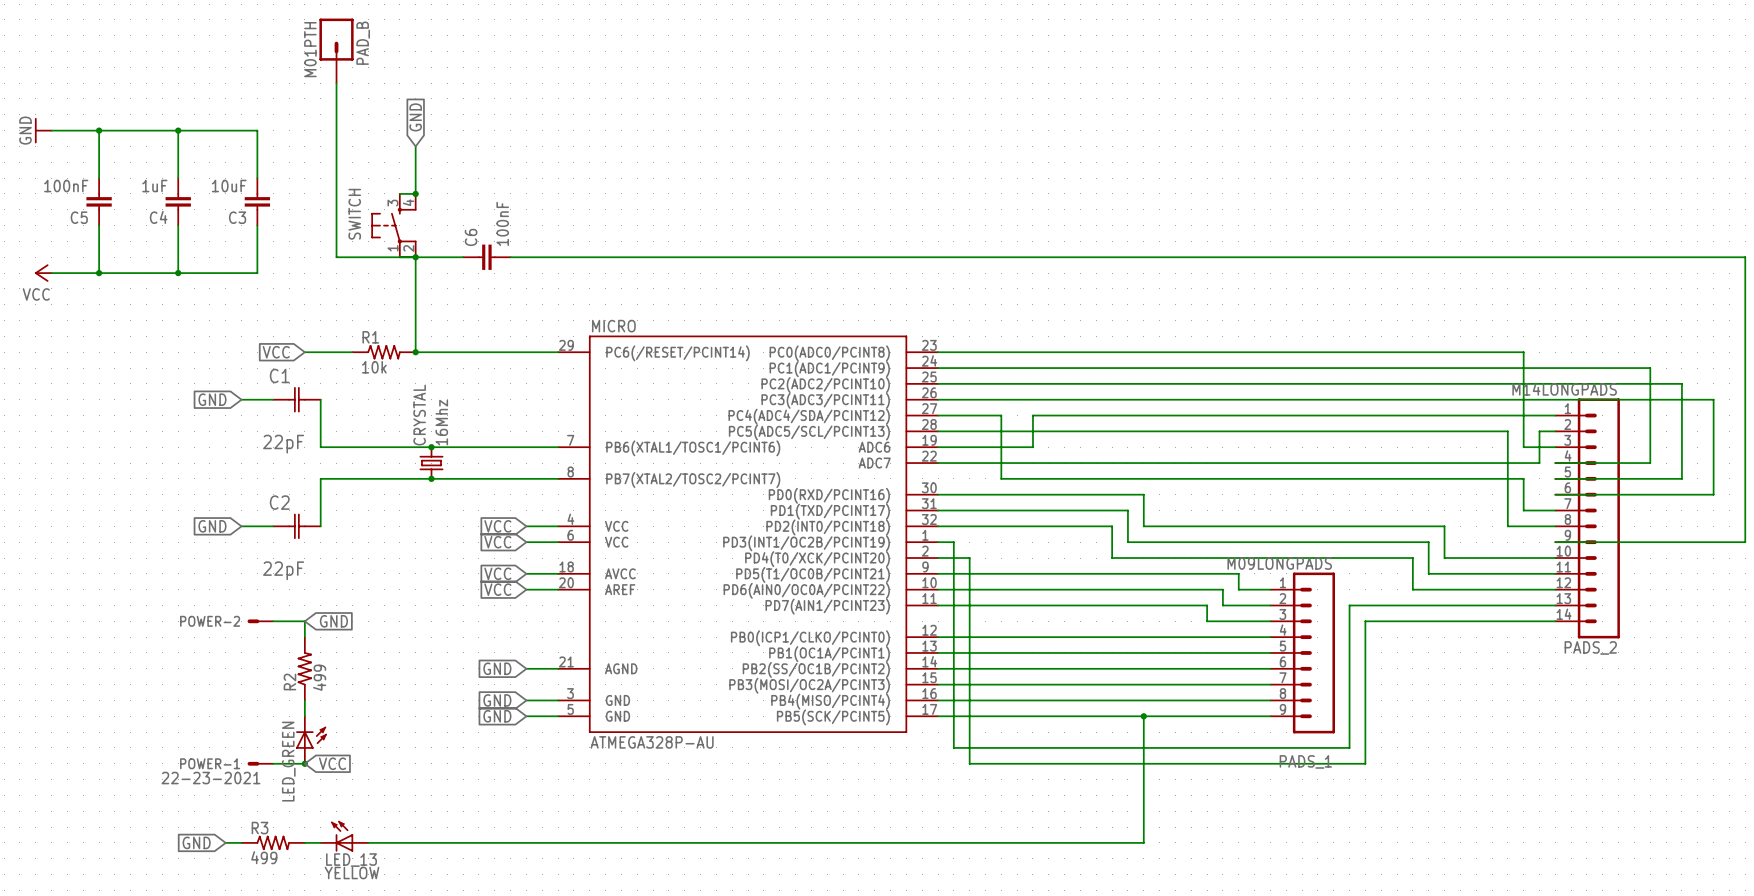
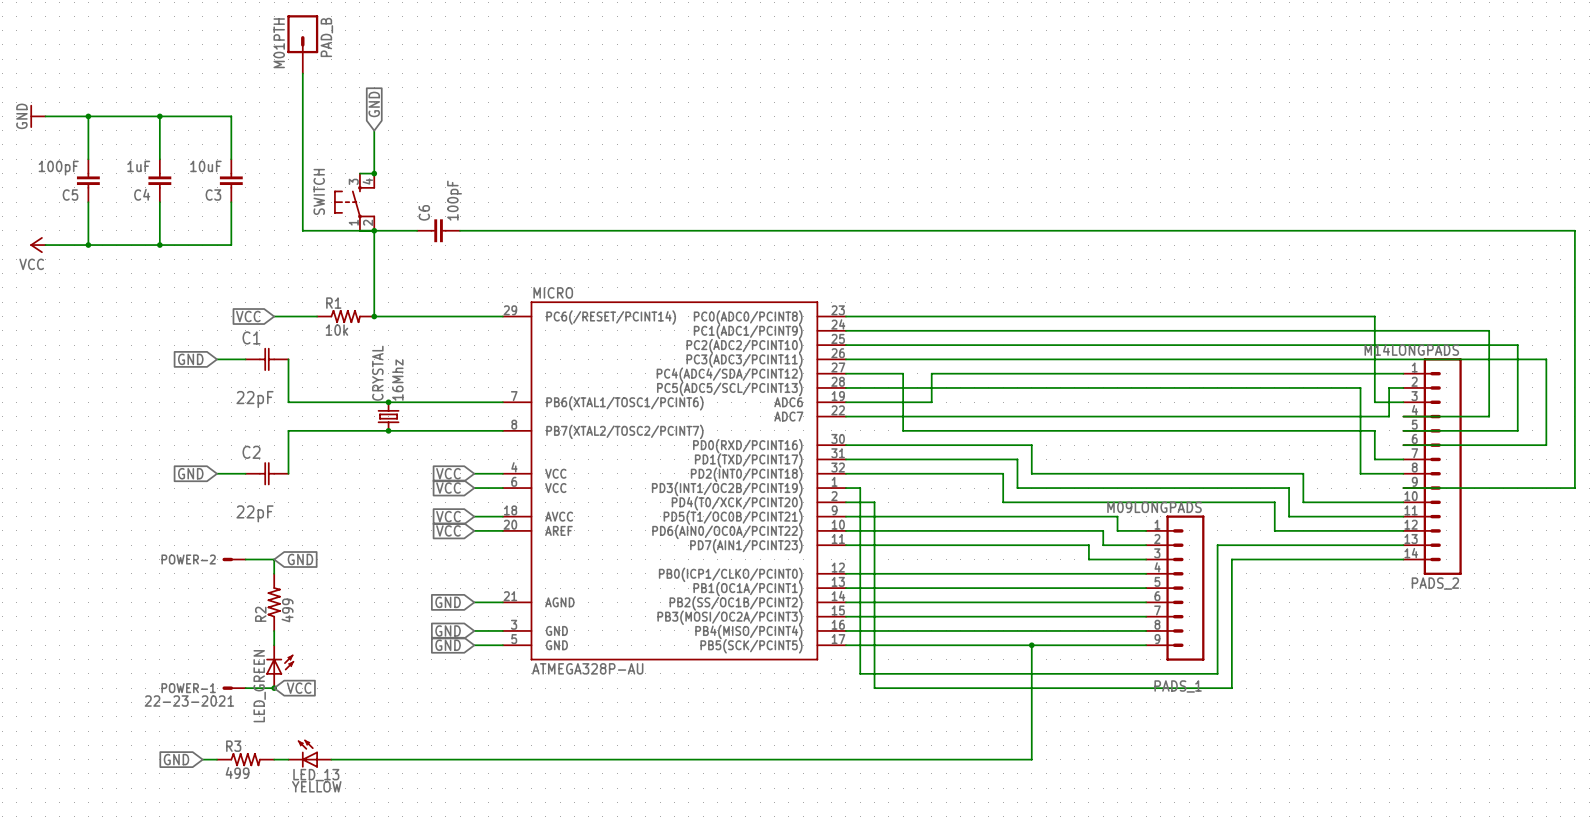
C5 value: 100nF (66, 186) -> 100pF (58, 168)
C6 value: 100nF (502, 223) -> 100pF (454, 200)

